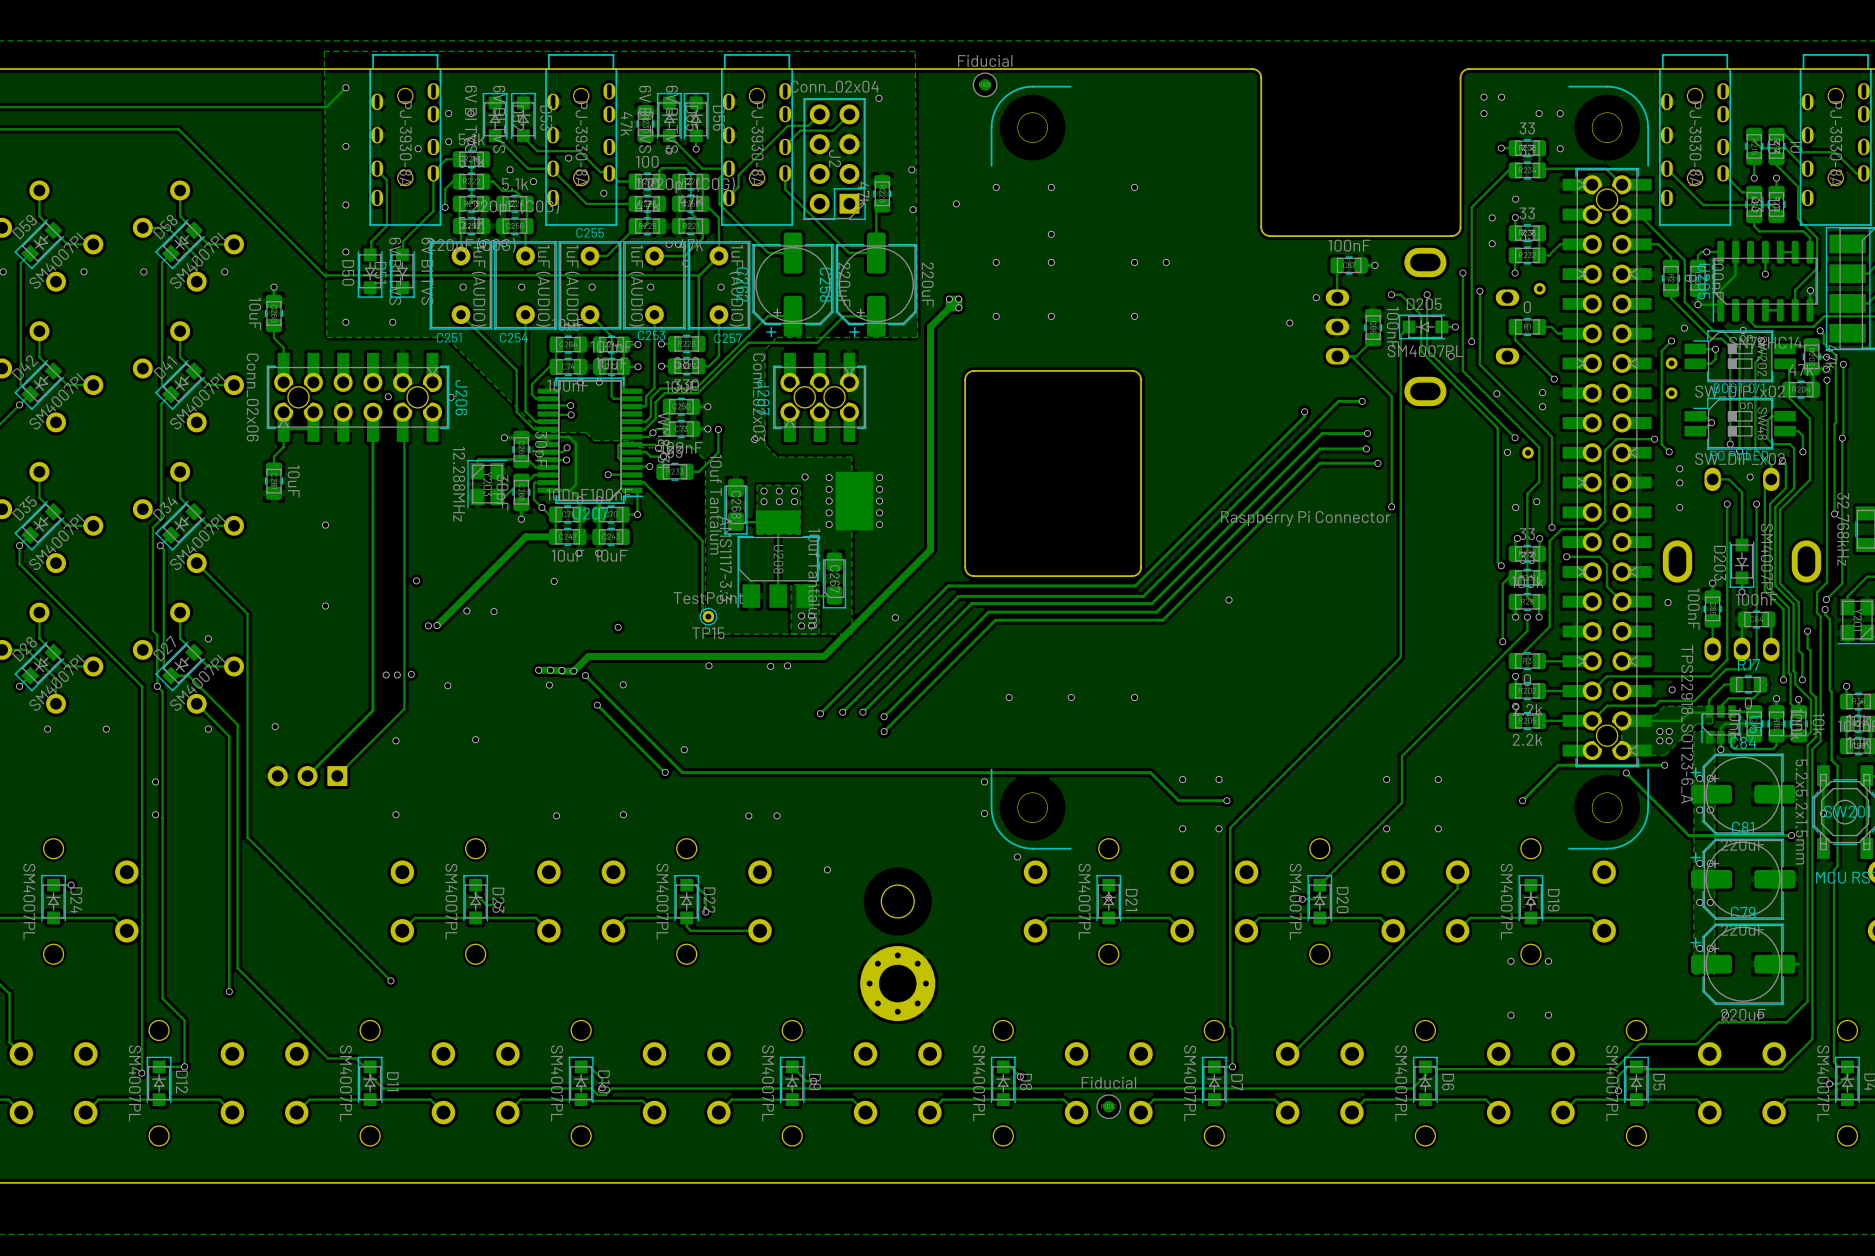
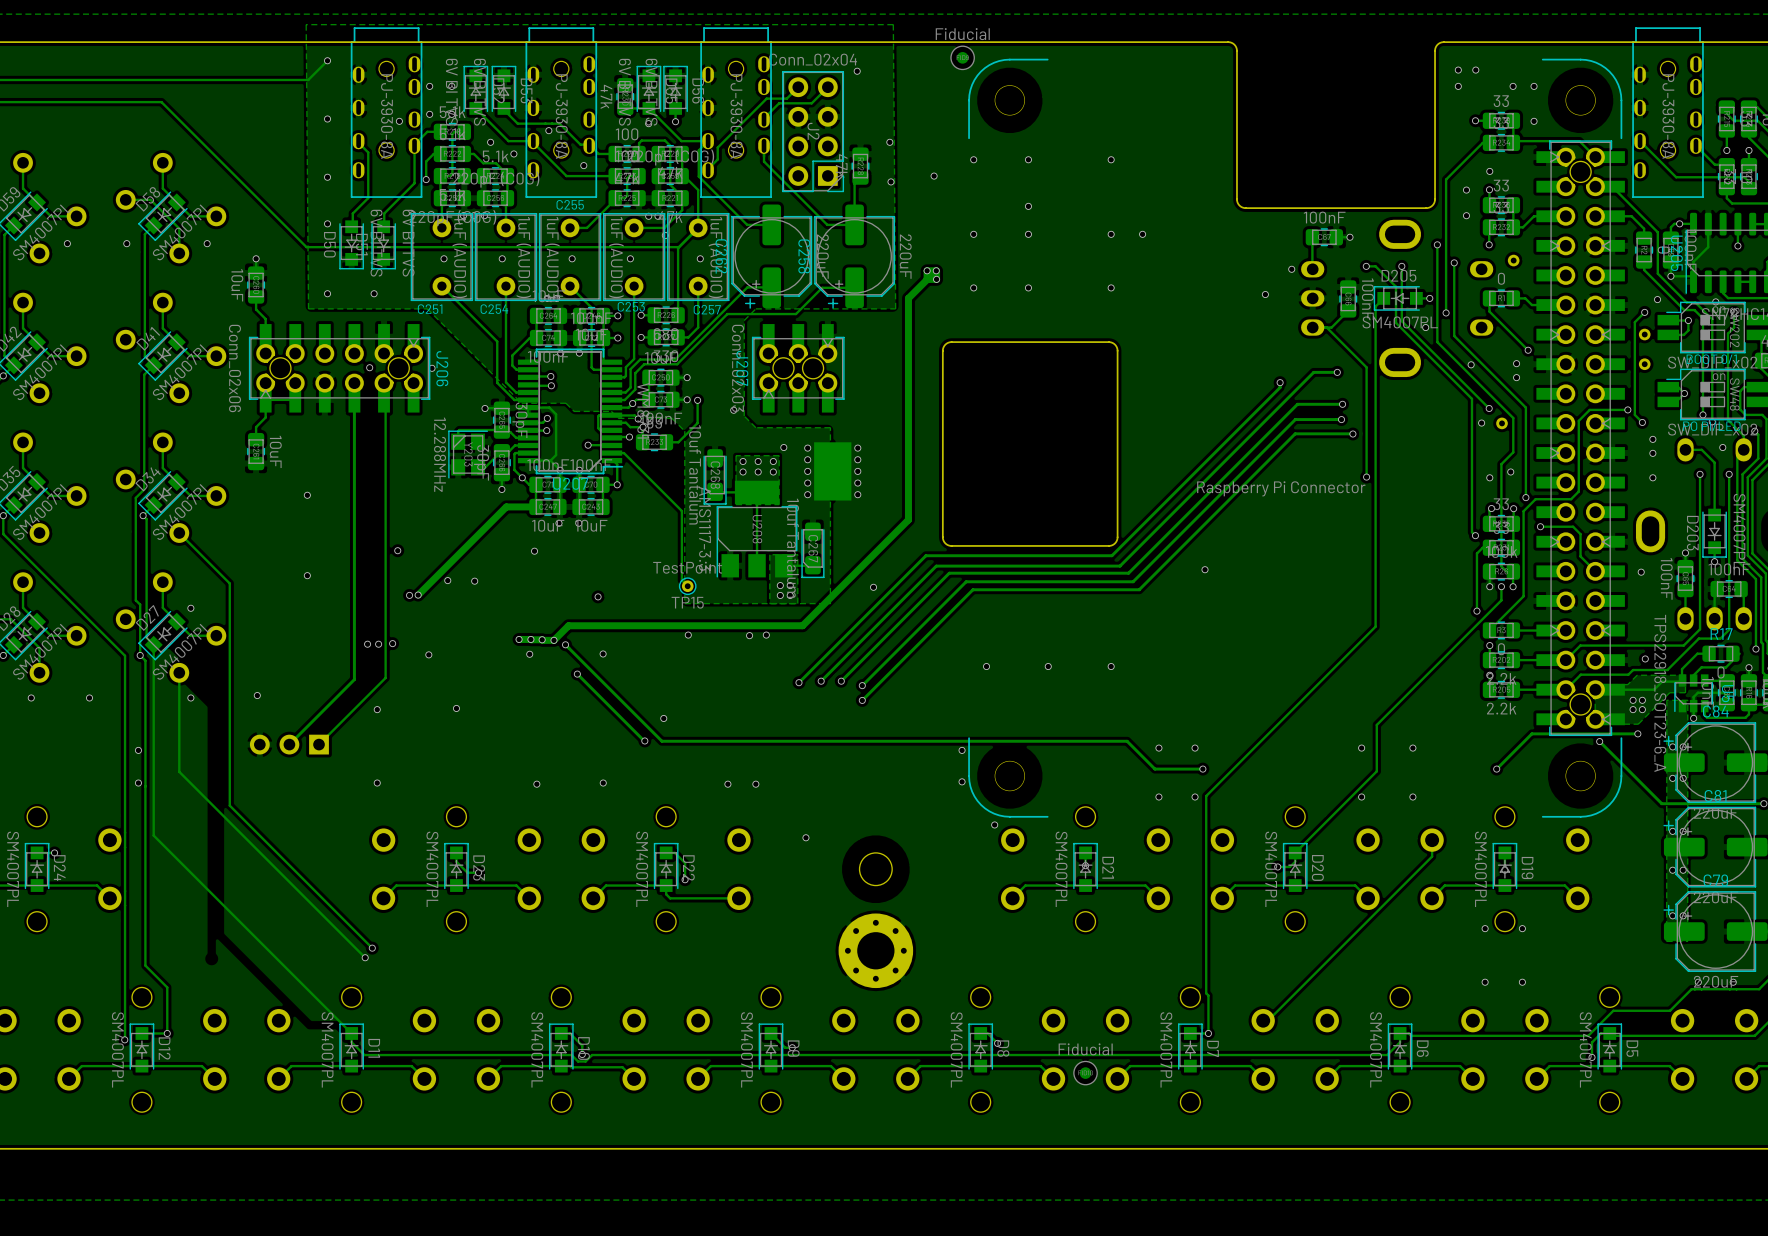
track: (170, 675) (188, 675) (237, 724) (237, 968) (327, 1058) (356, 1058) (364, 1066) (370, 1066) -> (153, 644) (153, 835) (351, 1033)
track: (196, 703) (229, 736) (229, 991) -> (179, 672) (179, 771) (365, 957)
via: none -> (365, 957)
via: (229, 991) -> none

